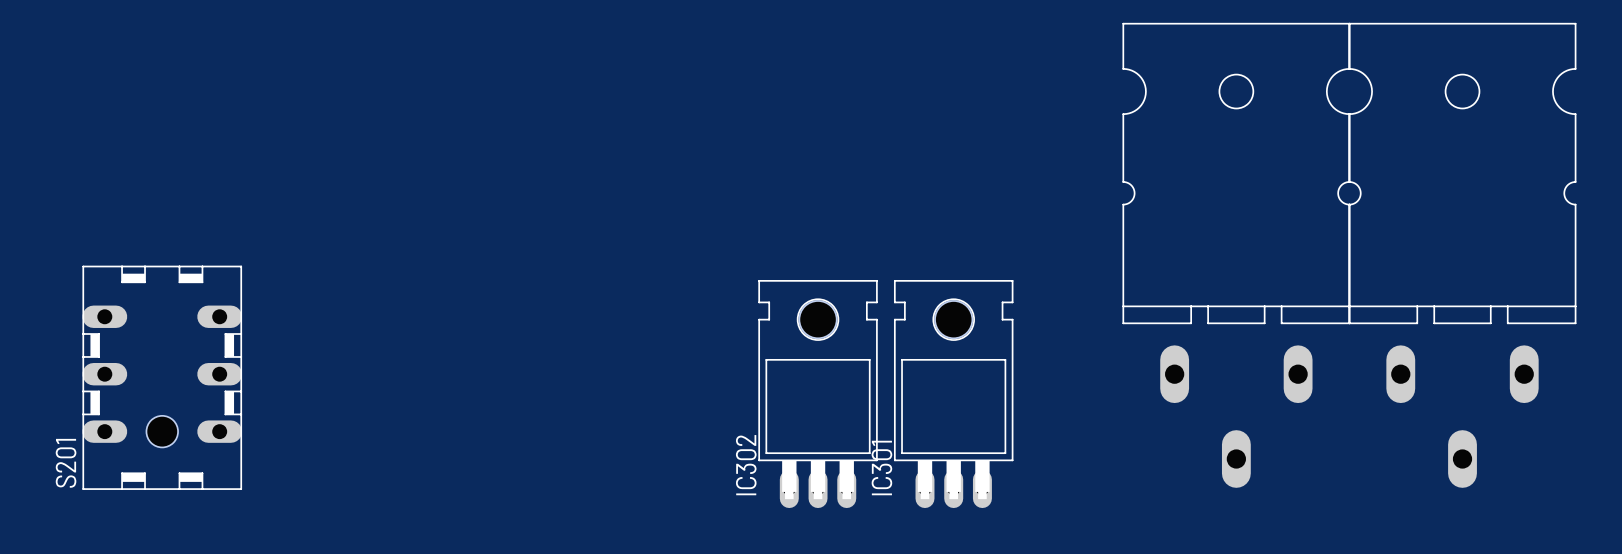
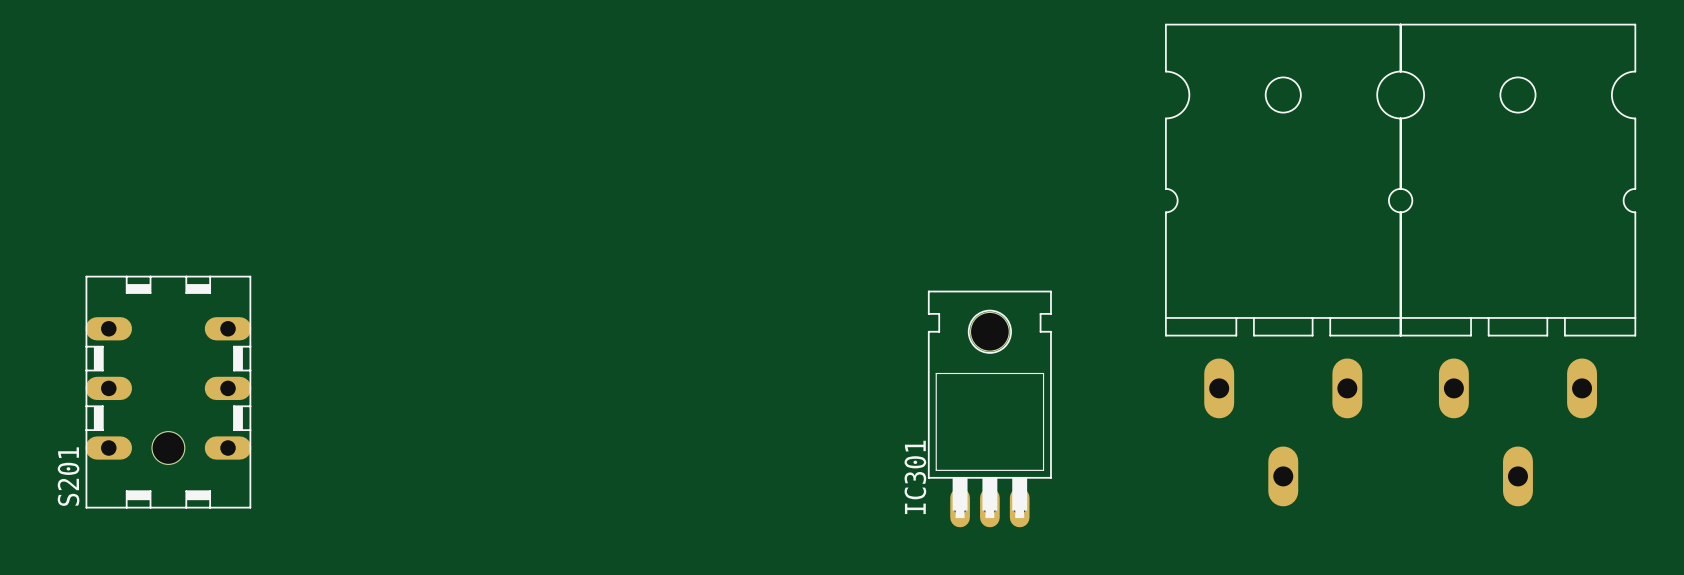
IC302: (818, 394) -> none

